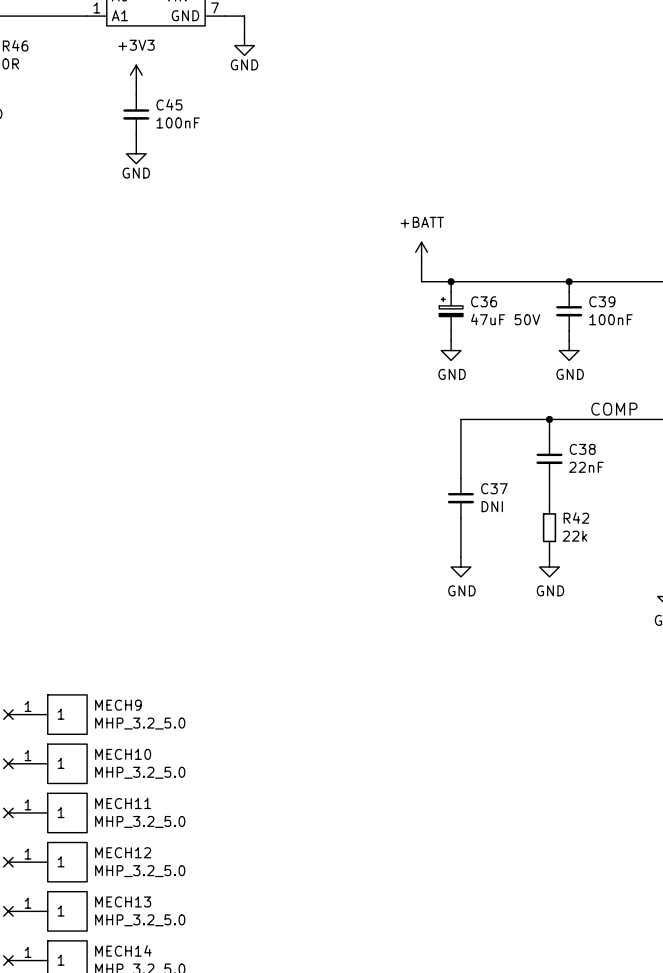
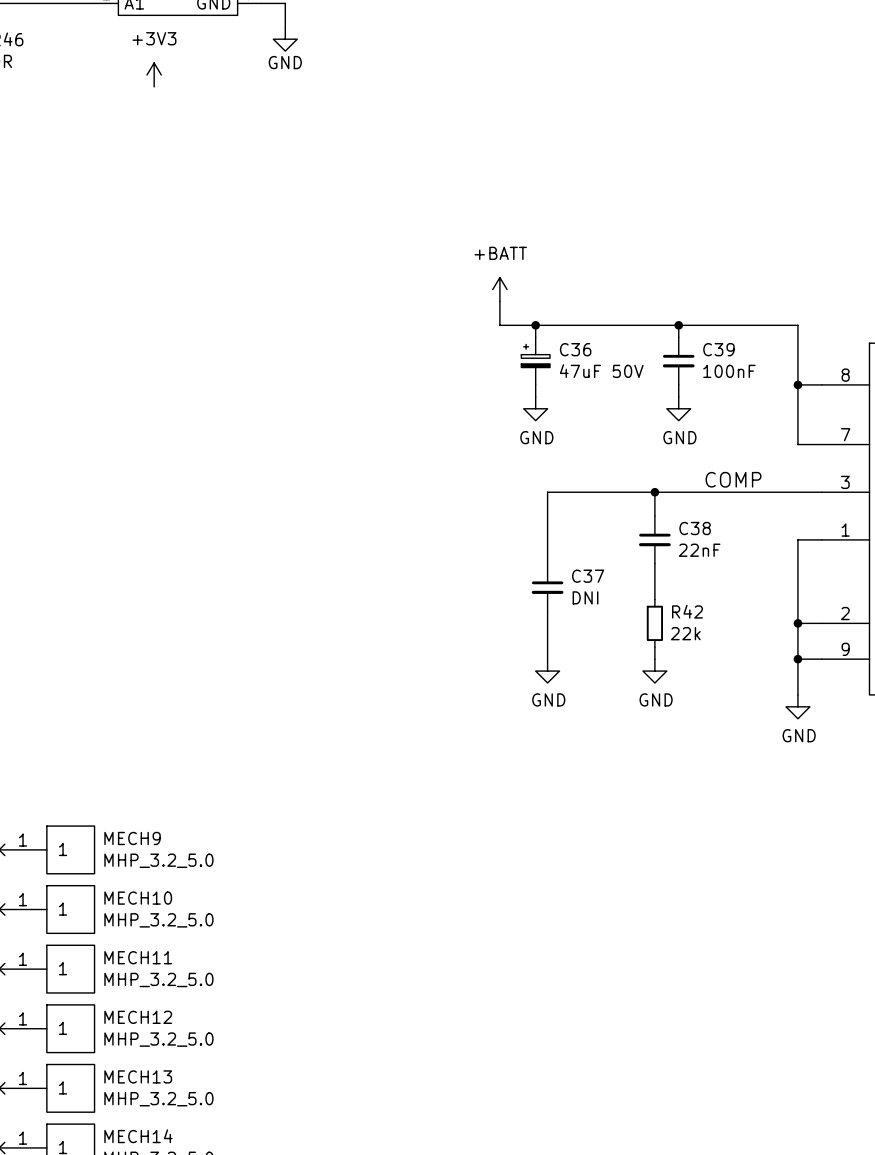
wire: (136, 84) (136, 94) -> none
C45: 100nF (136, 114) -> none
wire: (136, 134) (136, 143) -> none
power symbol: GND (136, 153) -> none

